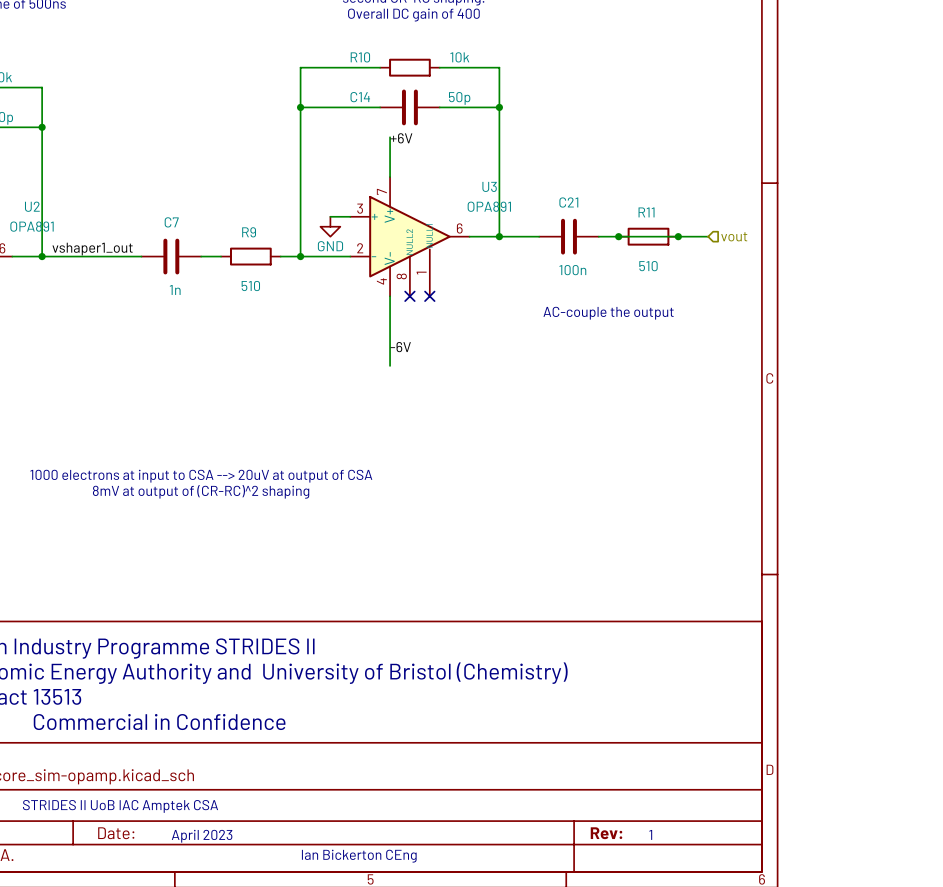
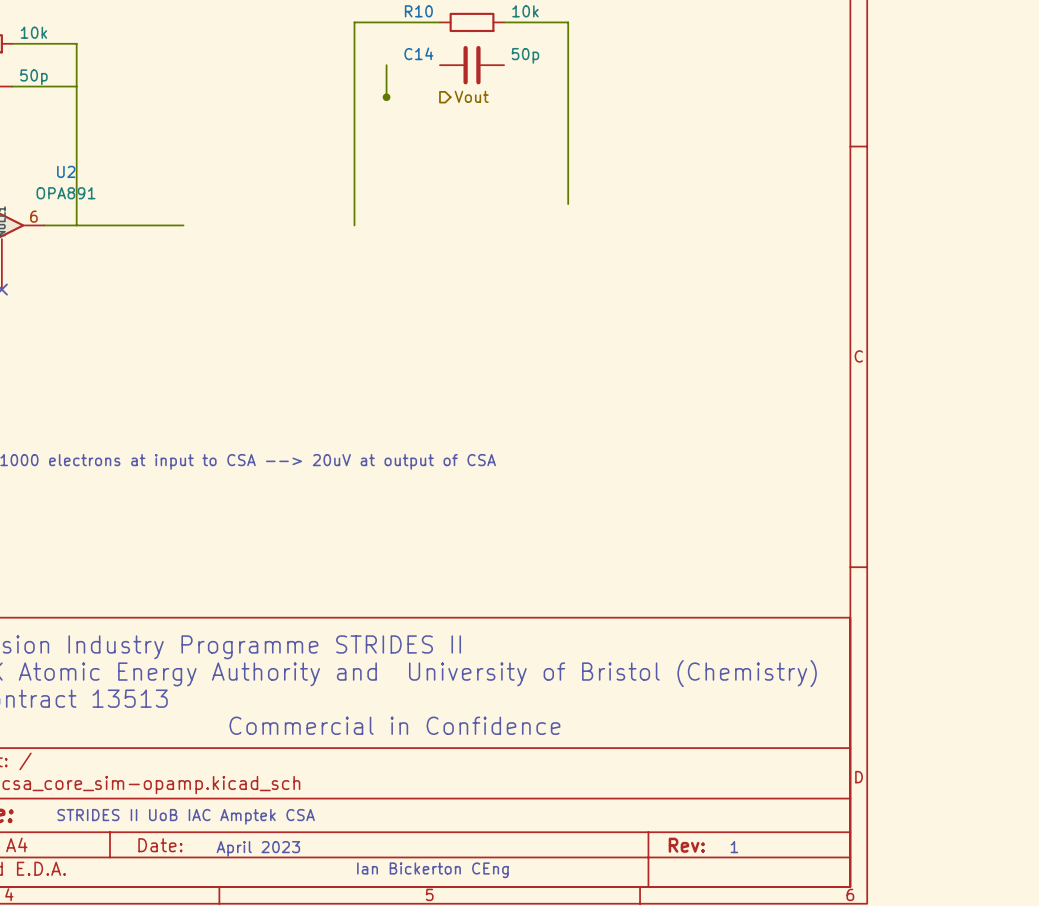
wire: (300, 107) (380, 107) -> none
junction position: (300, 107) -> (386, 97)
wire: none -> (386, 65) (386, 97)
wire: (439, 107) (499, 107) -> none
junction: (499, 107) -> none
junction: (42, 127) -> none
hierarchical label: none -> Vout (471, 96)
wire: (390, 137) (390, 177) -> none
label: +6V (401, 138) -> none
wire: (330, 216) (350, 216) -> none
power symbol: GND (330, 226) -> none
U3: OPA891 (409, 236) -> none
wire: (469, 236) (539, 236) -> none
junction: (499, 236) -> none
C21: 100n (568, 236) -> none
wire: (598, 236) (708, 236) -> none
junction: (618, 236) -> none
R11: 510 (648, 236) -> none
junction: (678, 236) -> none
hierarchical label: vout (734, 236) -> none
label: vshaper1_out (92, 249) -> none
junction: (42, 256) -> none
C7: 1n (171, 256) -> none
wire: (201, 256) (221, 256) -> none
R9: 510 (250, 256) -> none
wire: (280, 256) (350, 256) -> none
junction: (300, 256) -> none
wire: (390, 296) (390, 365) -> none
no-connect mark: (409, 296) -> none
no-connect mark: (429, 296) -> none
text: AC-couple the output (608, 313) -> none
label: -6V (400, 347) -> none
text: 8mV at output of (CR-RC)^2 shaping (201, 491) -> none

